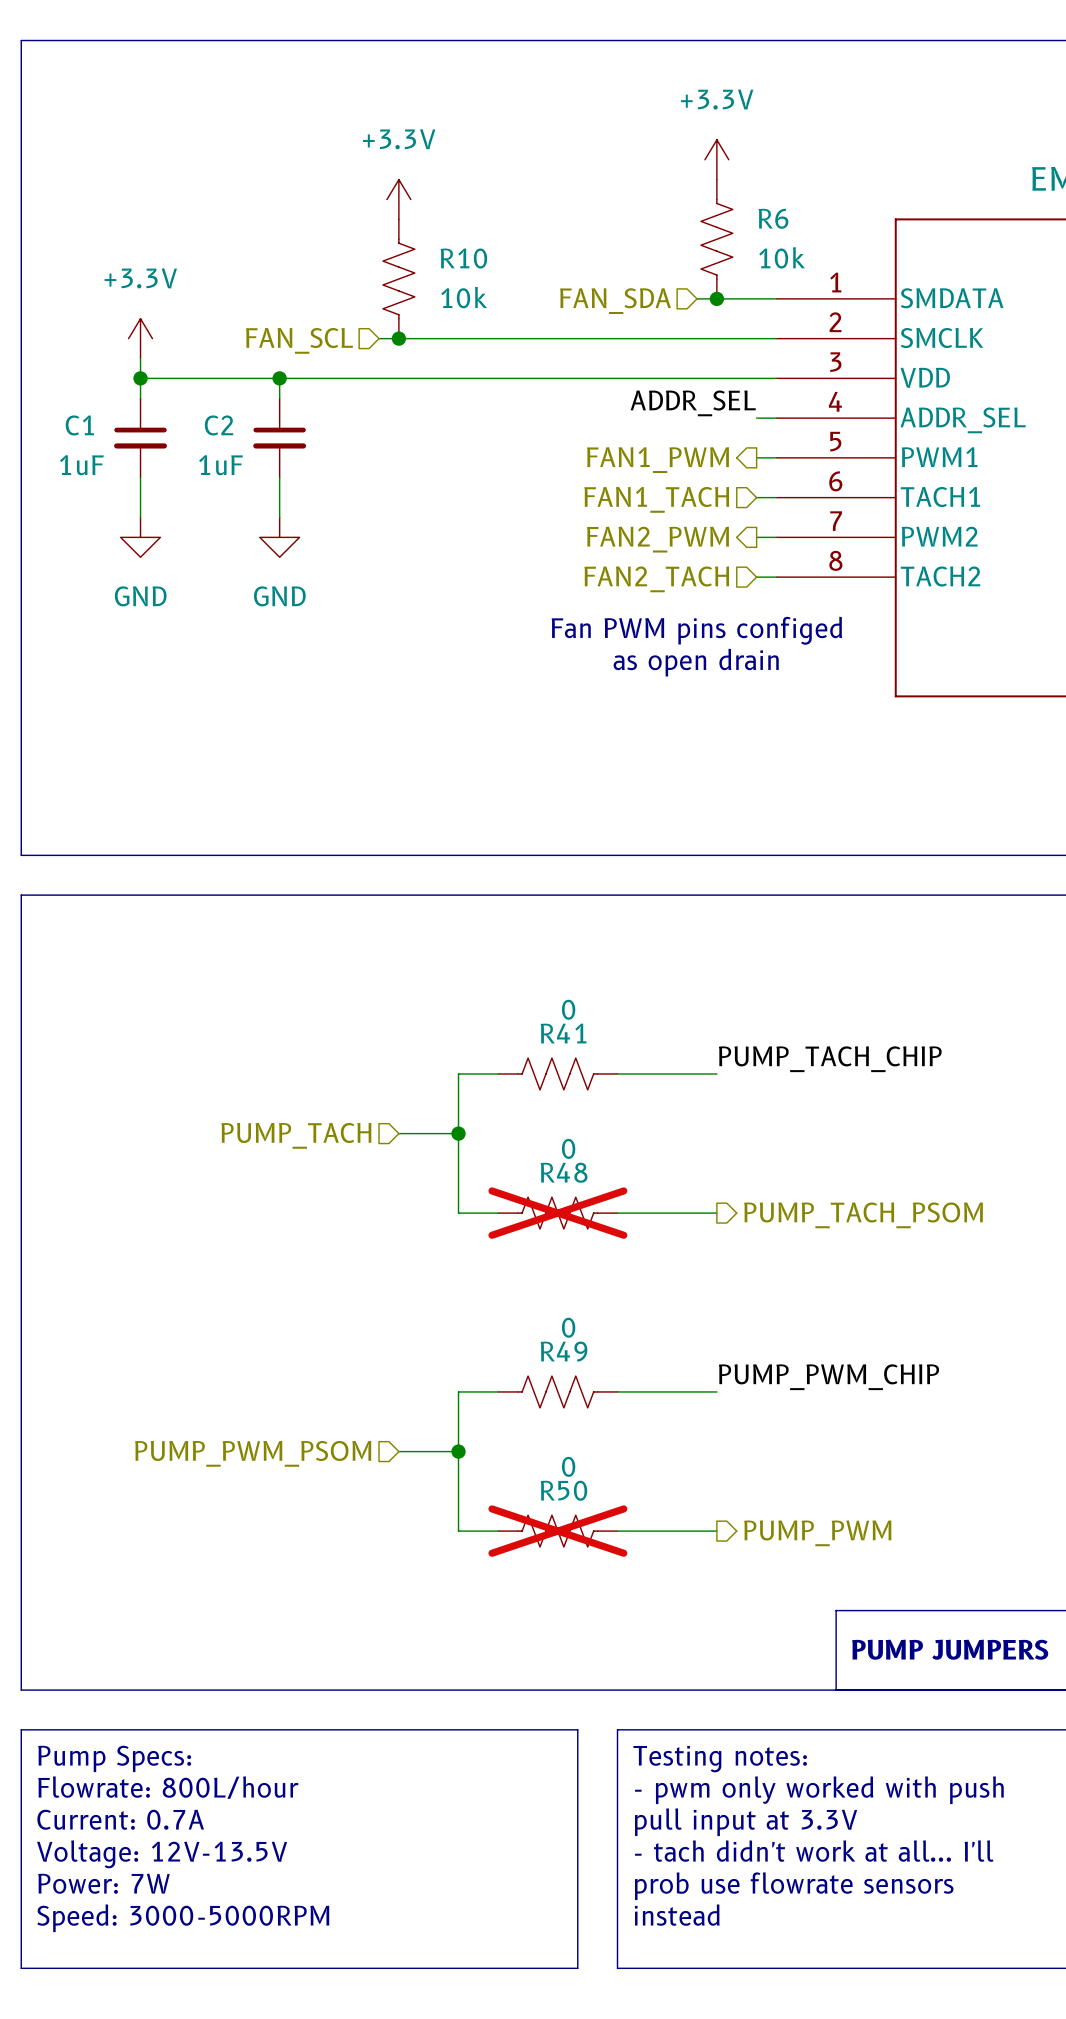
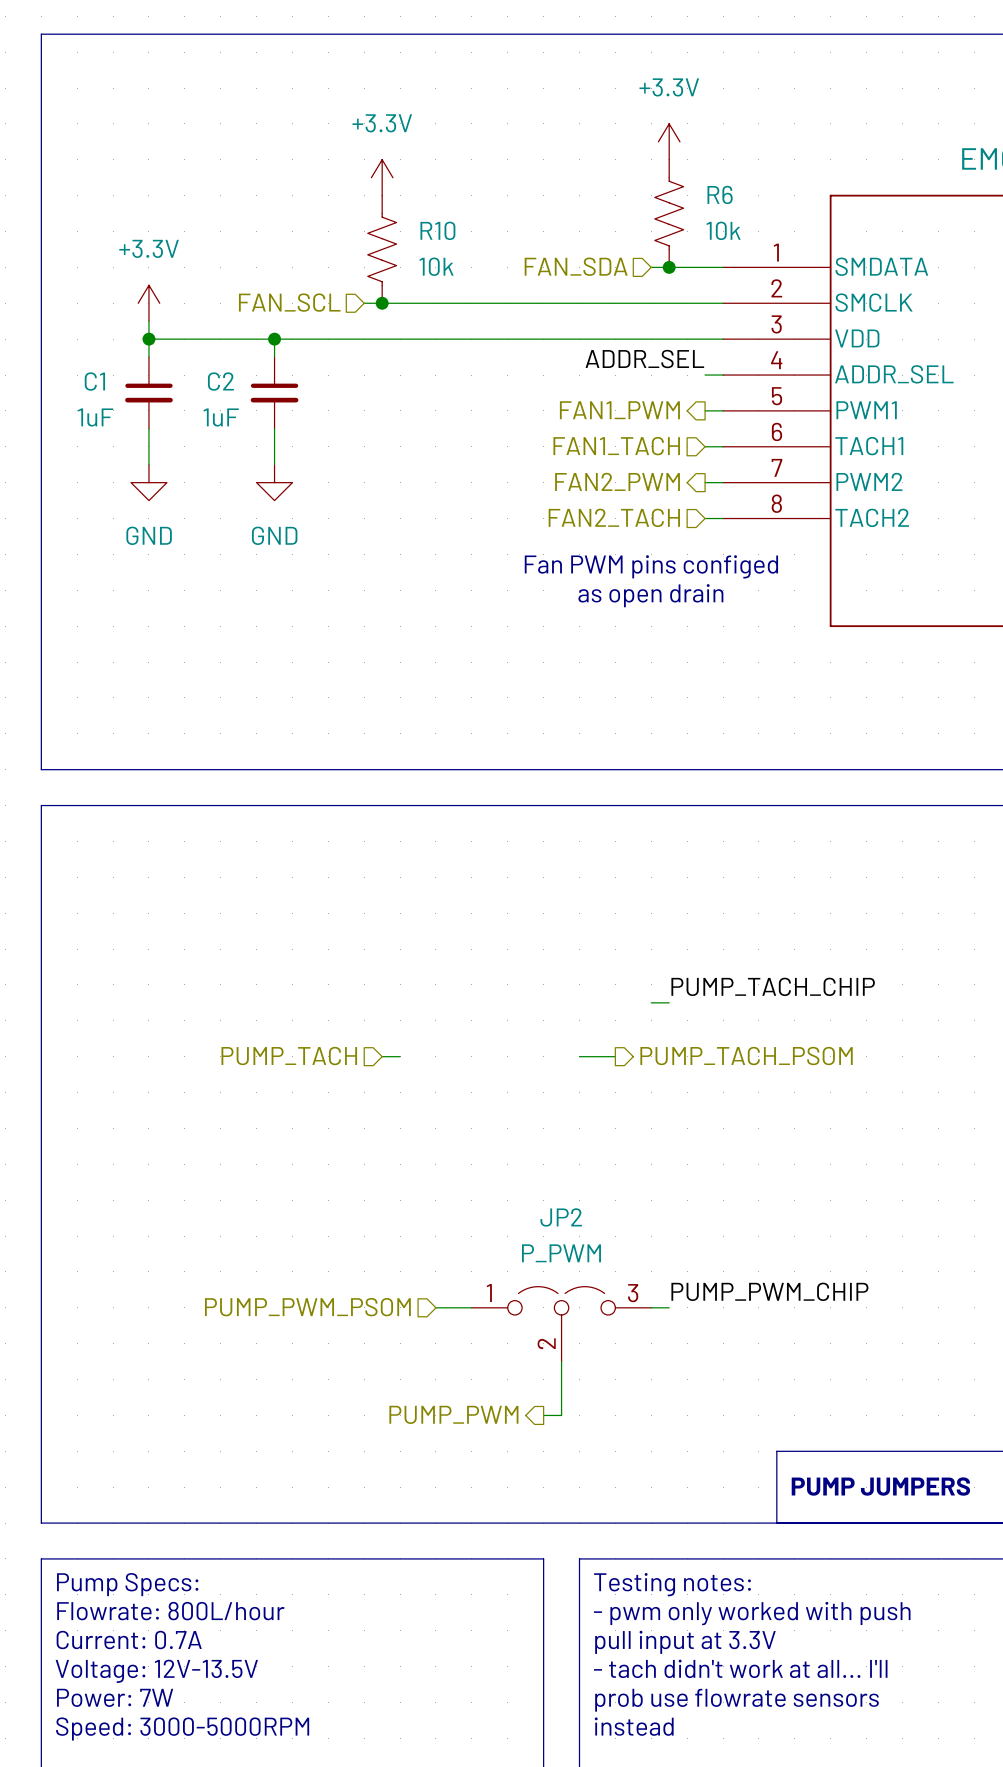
label position: PUMP_TACH_CHIP (830, 1059) -> PUMP_TACH_CHIP (773, 986)
wire: (498, 1073) (458, 1073) (458, 1213) (498, 1213) -> none
R41: 0 (557, 1073) -> none
wire: (617, 1073) (716, 1073) -> none
wire: none -> (651, 1002) (669, 1002)
wire: (398, 1133) (458, 1133) -> none
junction: (458, 1133) -> none
hierarchical label position: PUMP_TACH (296, 1135) -> PUMP_TACH (289, 1056)
wire: none -> (382, 1056) (400, 1056)
wire: none -> (579, 1056) (615, 1056)
R48: 0 (557, 1213) -> none
wire: (617, 1213) (716, 1213) -> none
hierarchical label position: PUMP_TACH_PSOM (863, 1215) -> PUMP_TACH_PSOM (746, 1056)
label position: PUMP_PWM_CHIP (828, 1377) -> PUMP_PWM_CHIP (769, 1291)
wire: (498, 1391) (458, 1391) (458, 1531) (498, 1531) -> none
R49: 0 (557, 1391) -> none
wire: (617, 1391) (716, 1391) -> none
wire: (398, 1451) (458, 1451) -> (471, 1307) (435, 1307)
junction: (458, 1451) -> none
wire: none -> (651, 1307) (669, 1307)
hierarchical label position: PUMP_PWM_PSOM (253, 1453) -> PUMP_PWM_PSOM (307, 1307)
JP2: none -> P_PWM (561, 1324)
wire: none -> (561, 1361) (561, 1415) (543, 1415)
R50: 0 (557, 1531) -> none
wire: (617, 1531) (716, 1531) -> none
hierarchical label rotation: 0° (817, 1533) -> 180° (453, 1414)
hierarchical label position: PUMP_PWM (817, 1533) -> PUMP_PWM (453, 1414)

